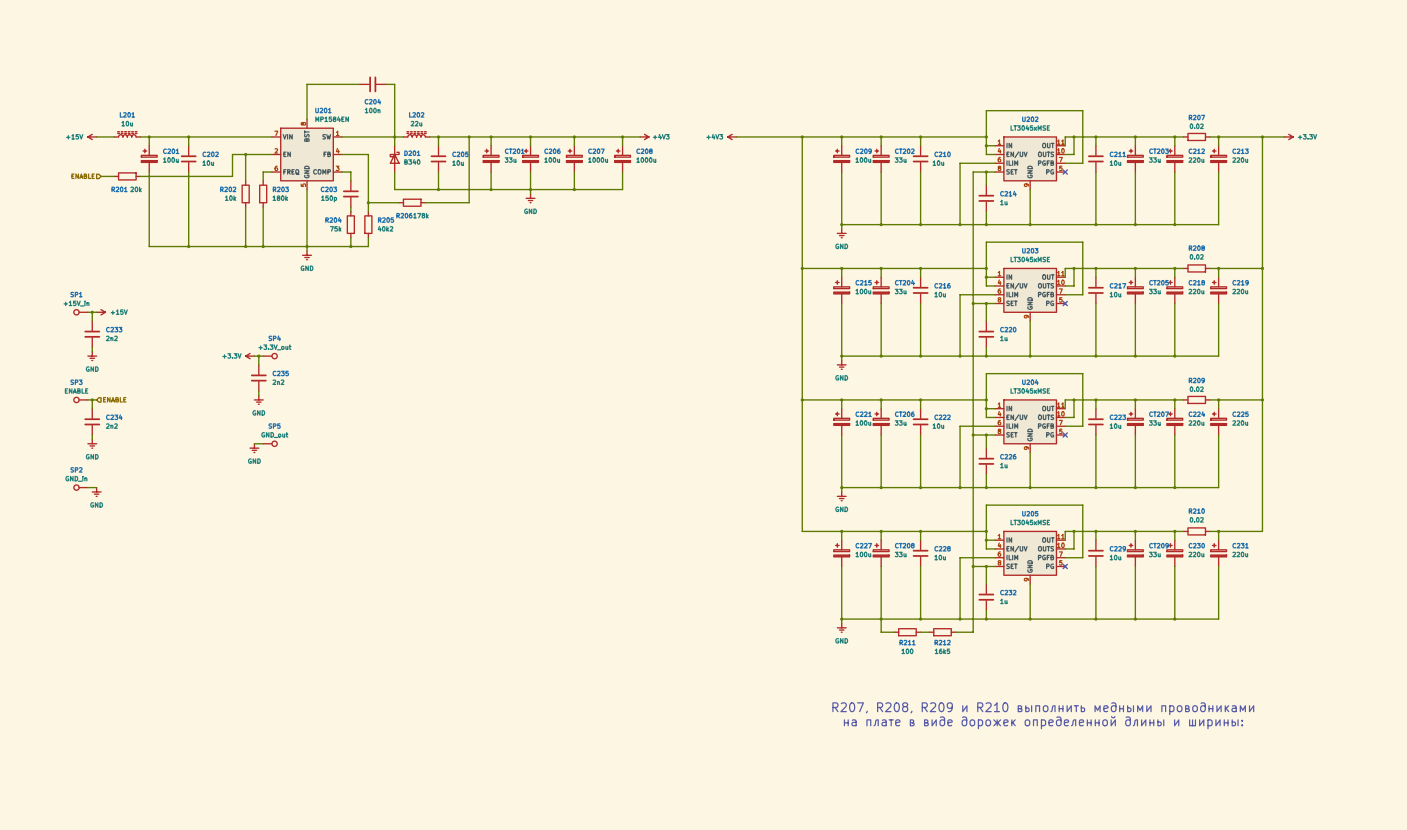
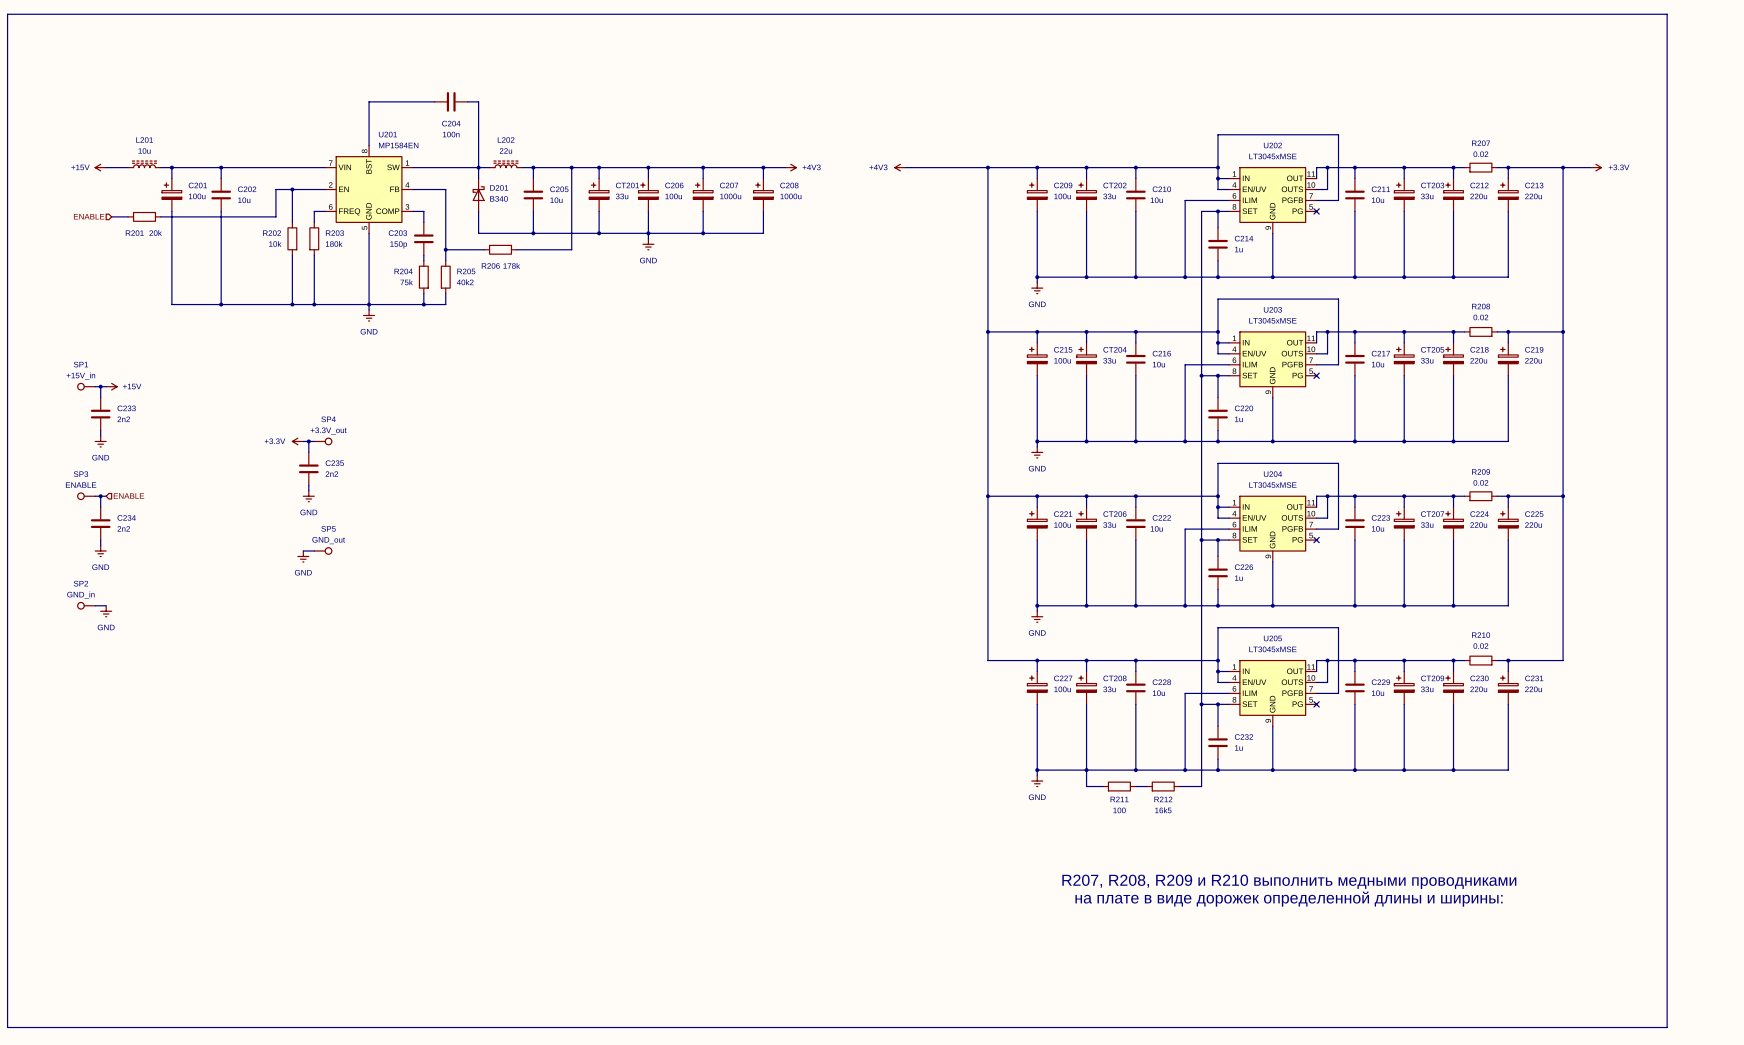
line: none -> (7, 14) (1667, 14) (1667, 1027) (7, 1027) (7, 14)

